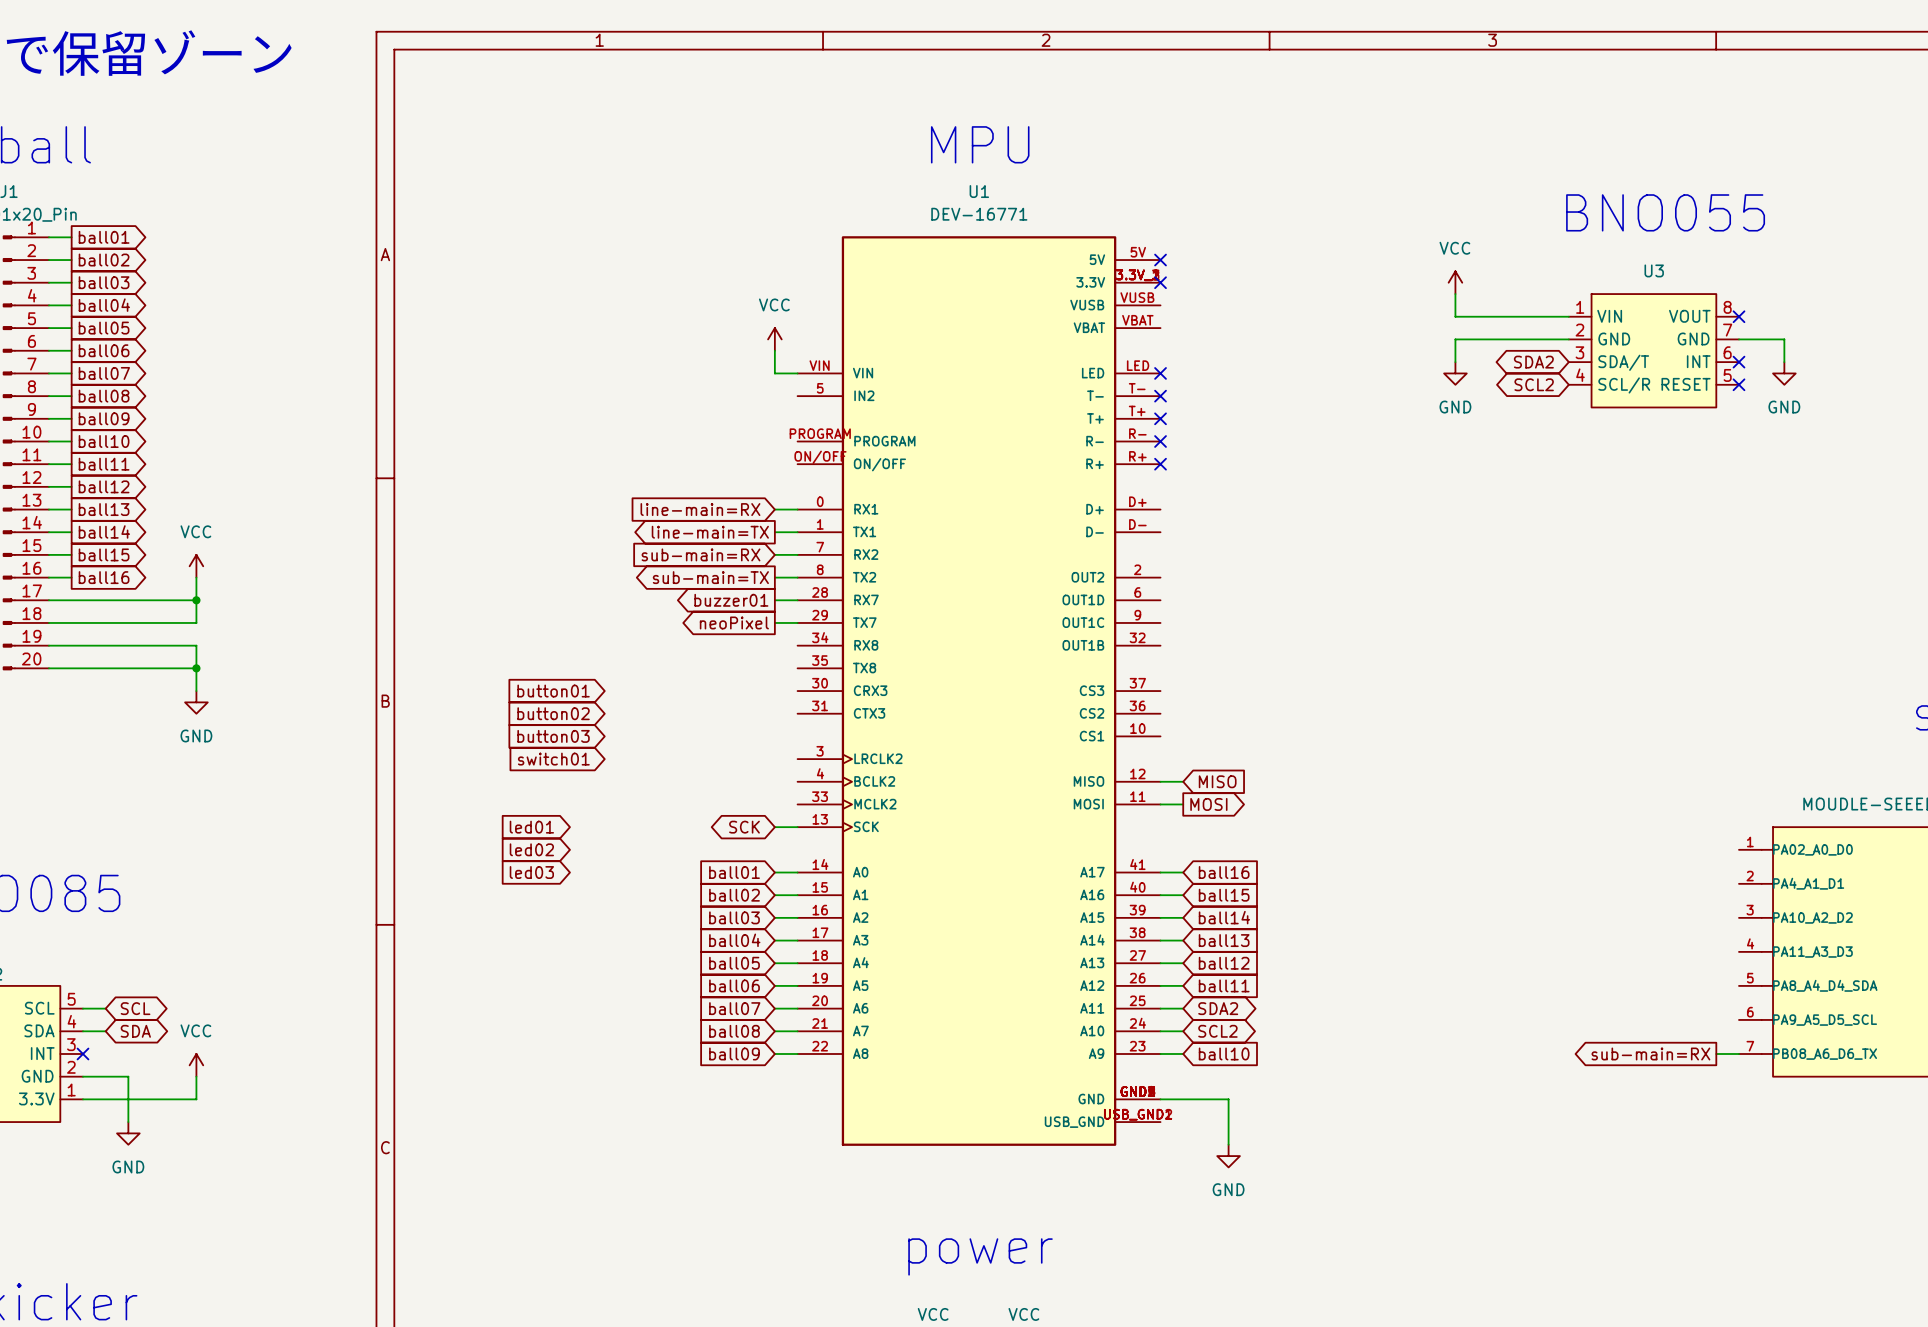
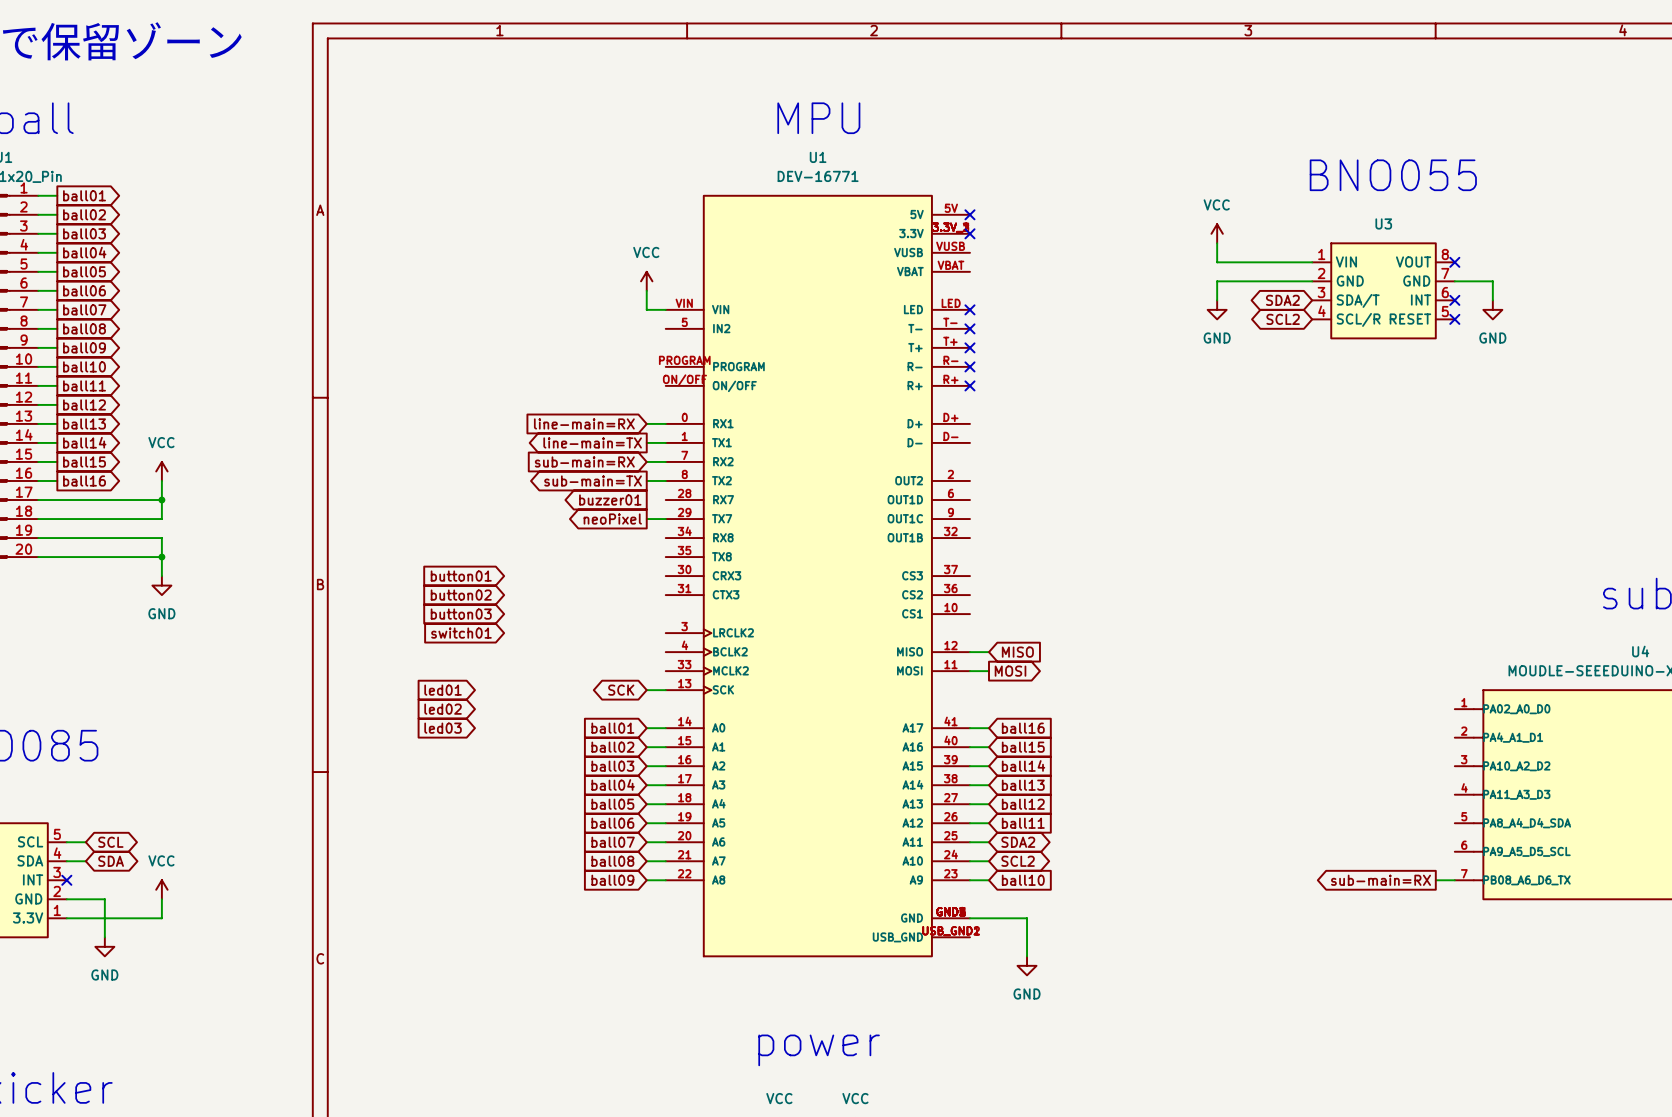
wire: (774, 600) (797, 600) -> none

